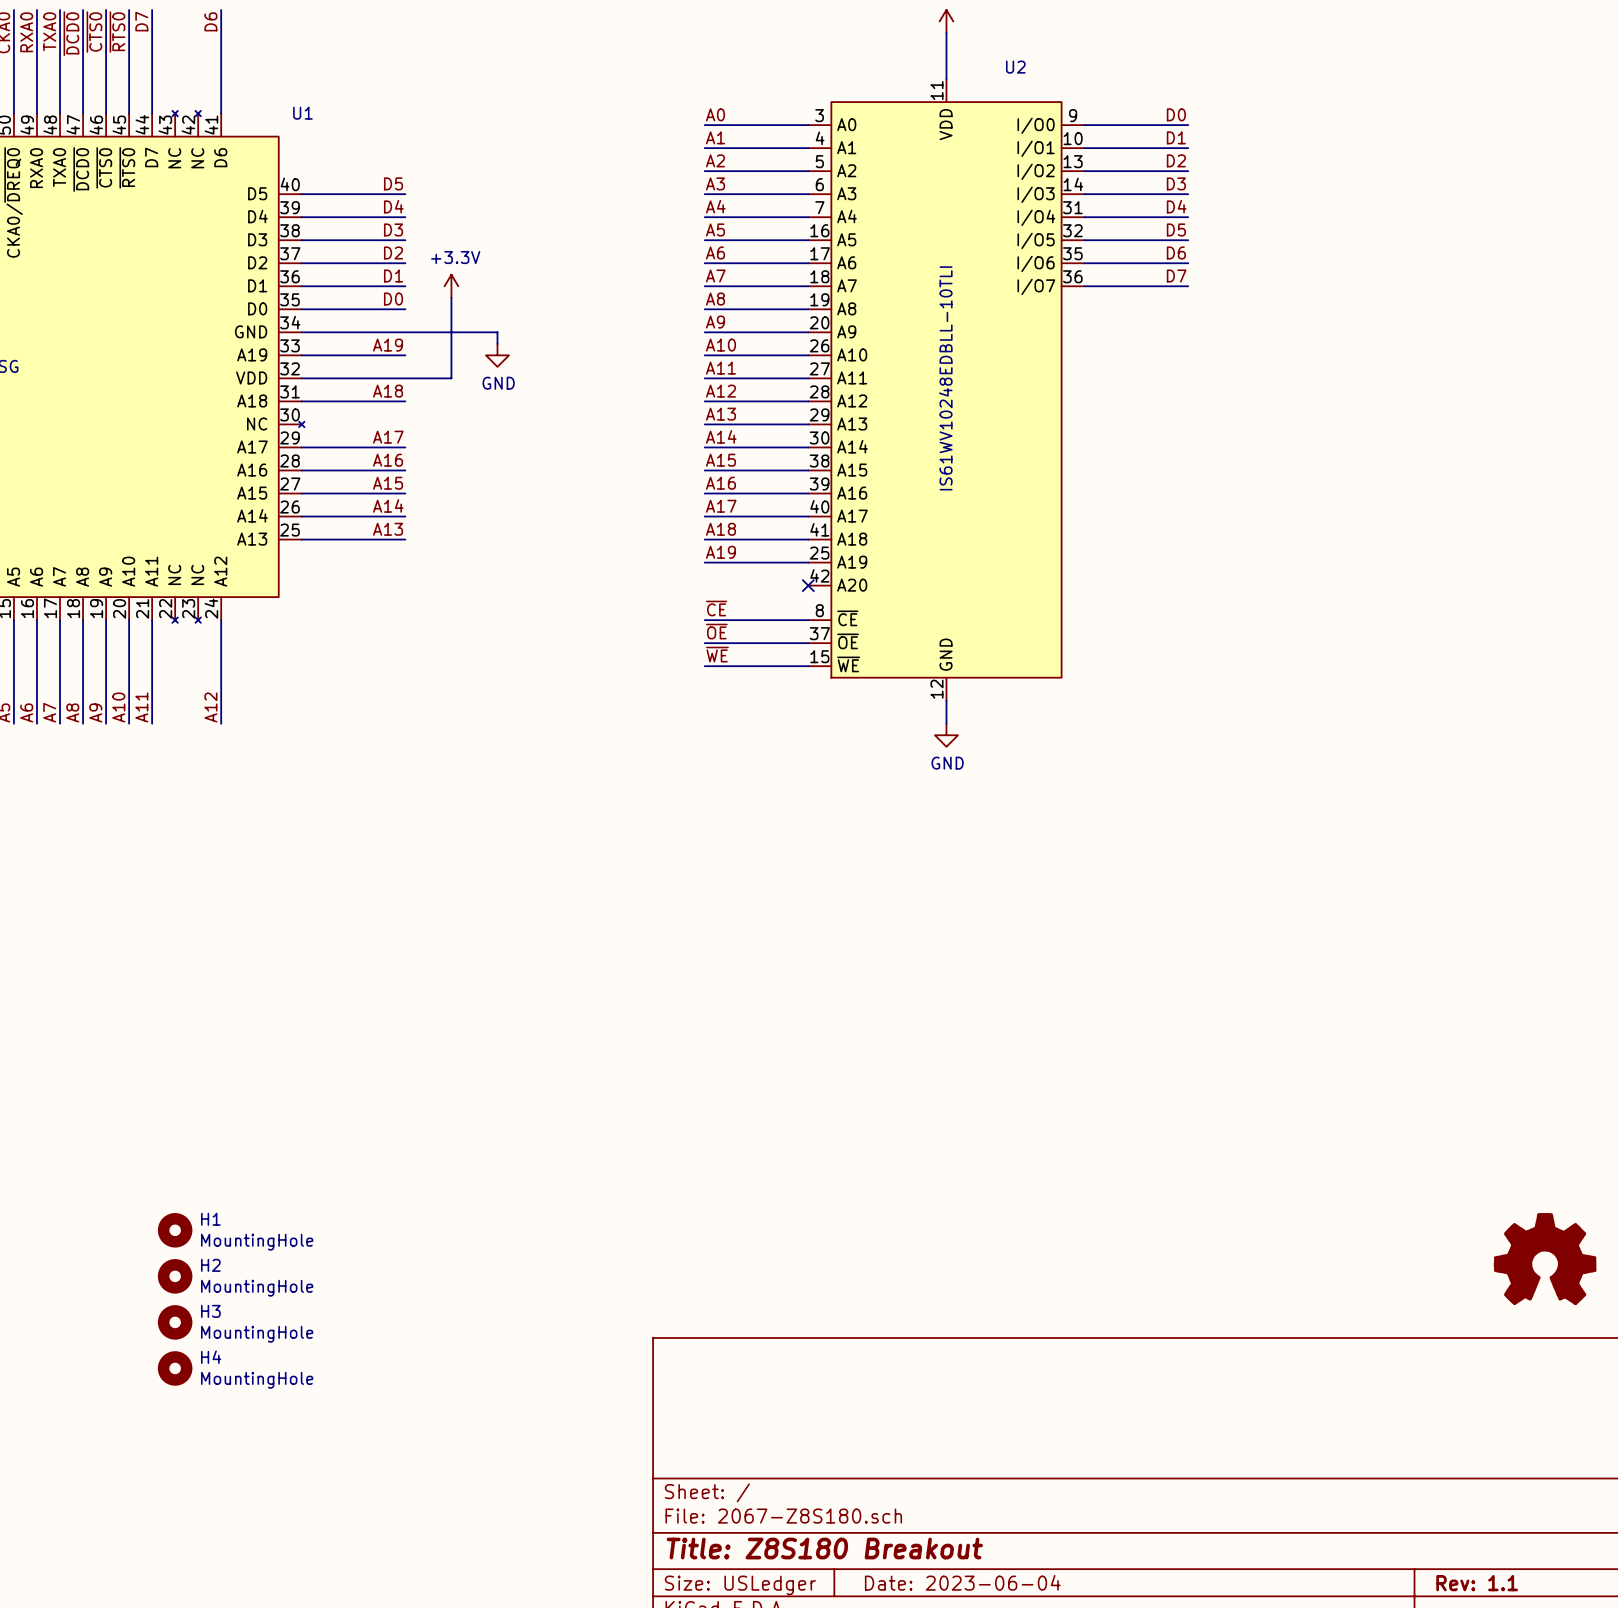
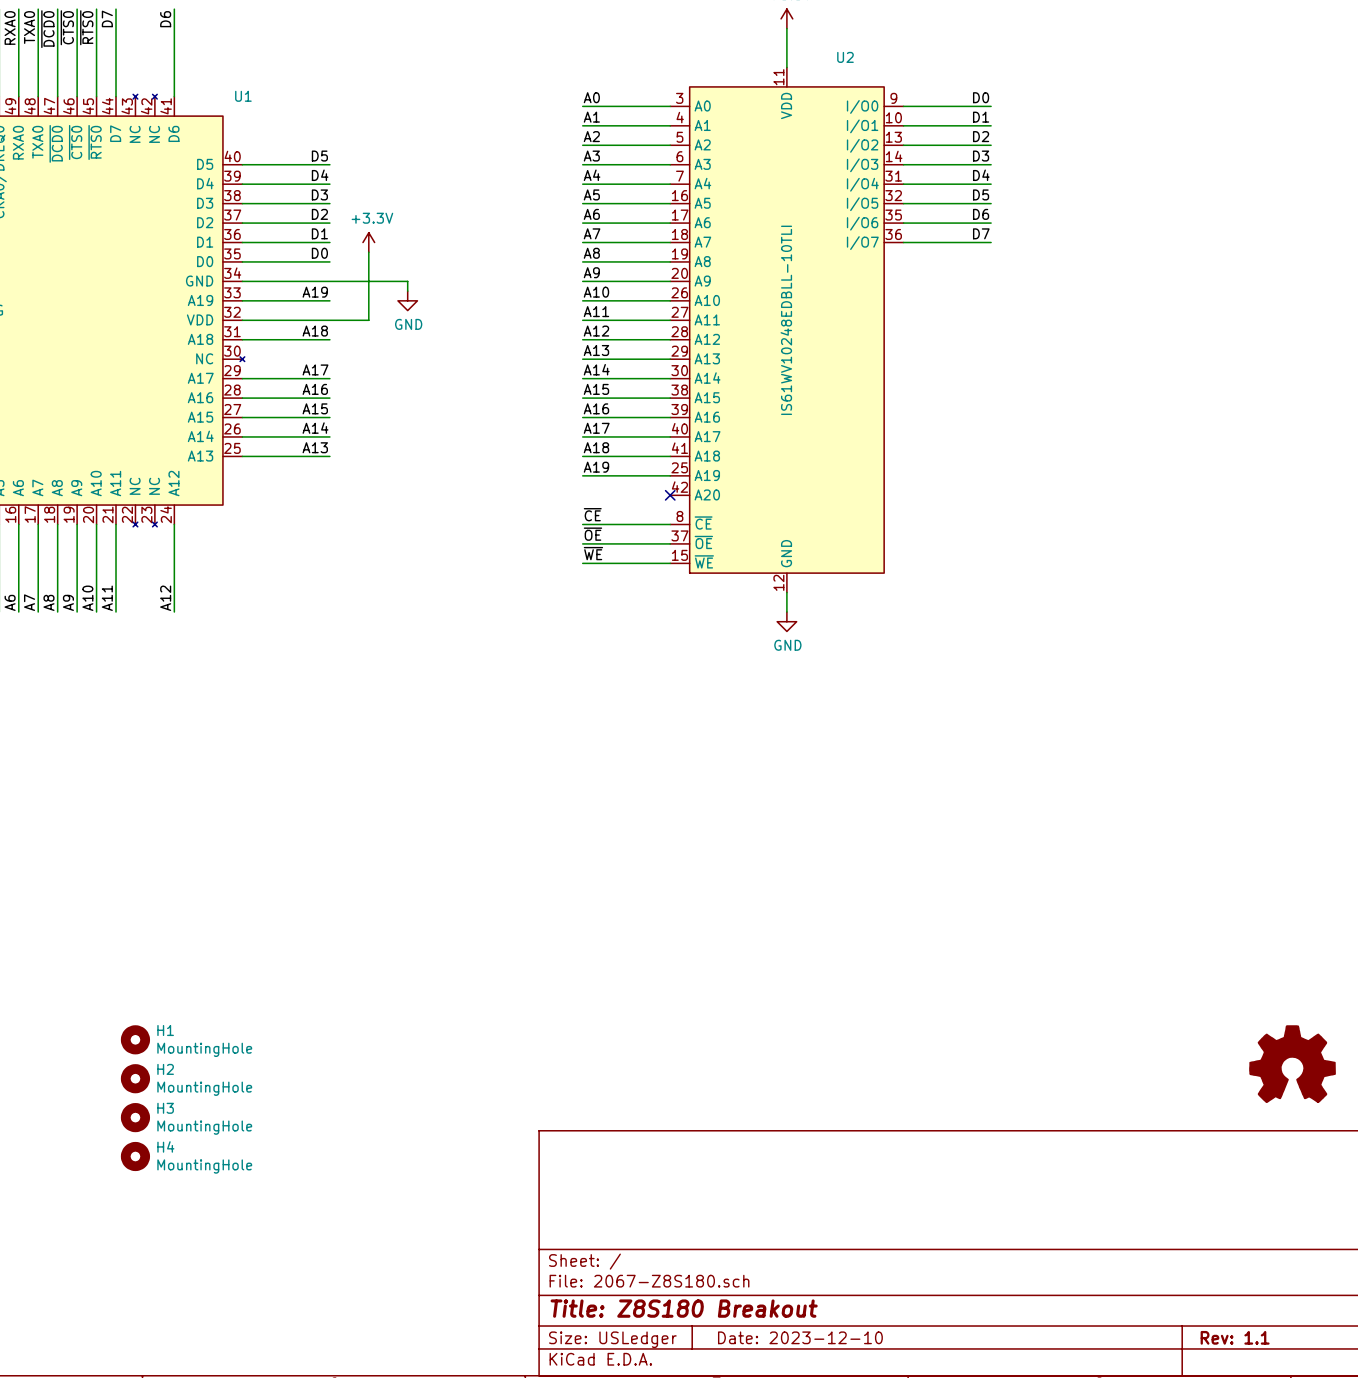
title block: Date: 2023-06-04 (962, 1582) -> Date: 2023-12-10 (800, 1337)

